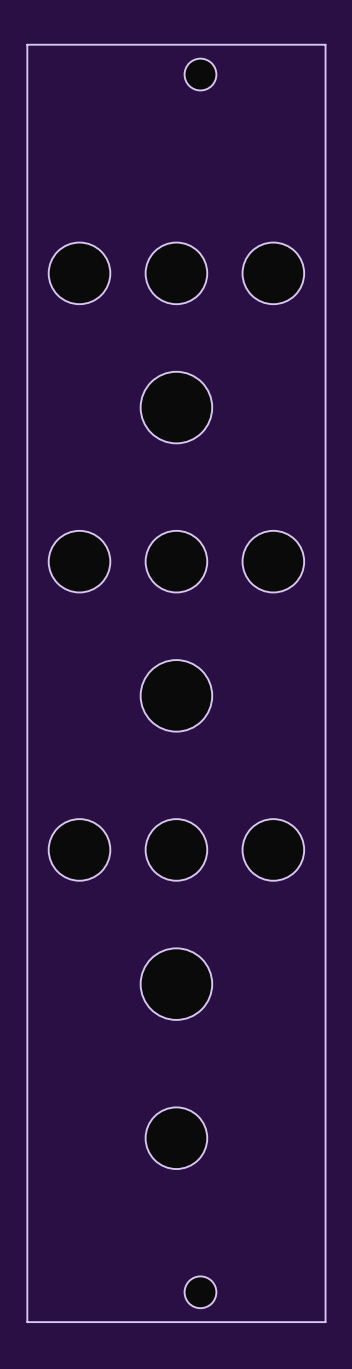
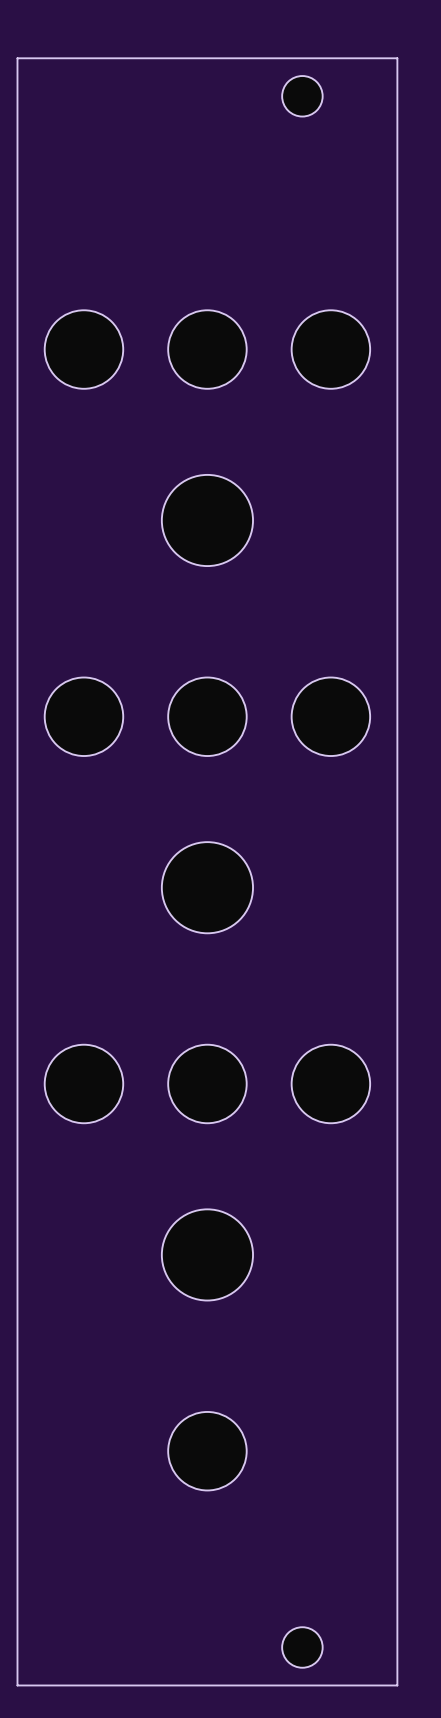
part position: (200, 74) -> (302, 96)
part position: (200, 1292) -> (302, 1647)

